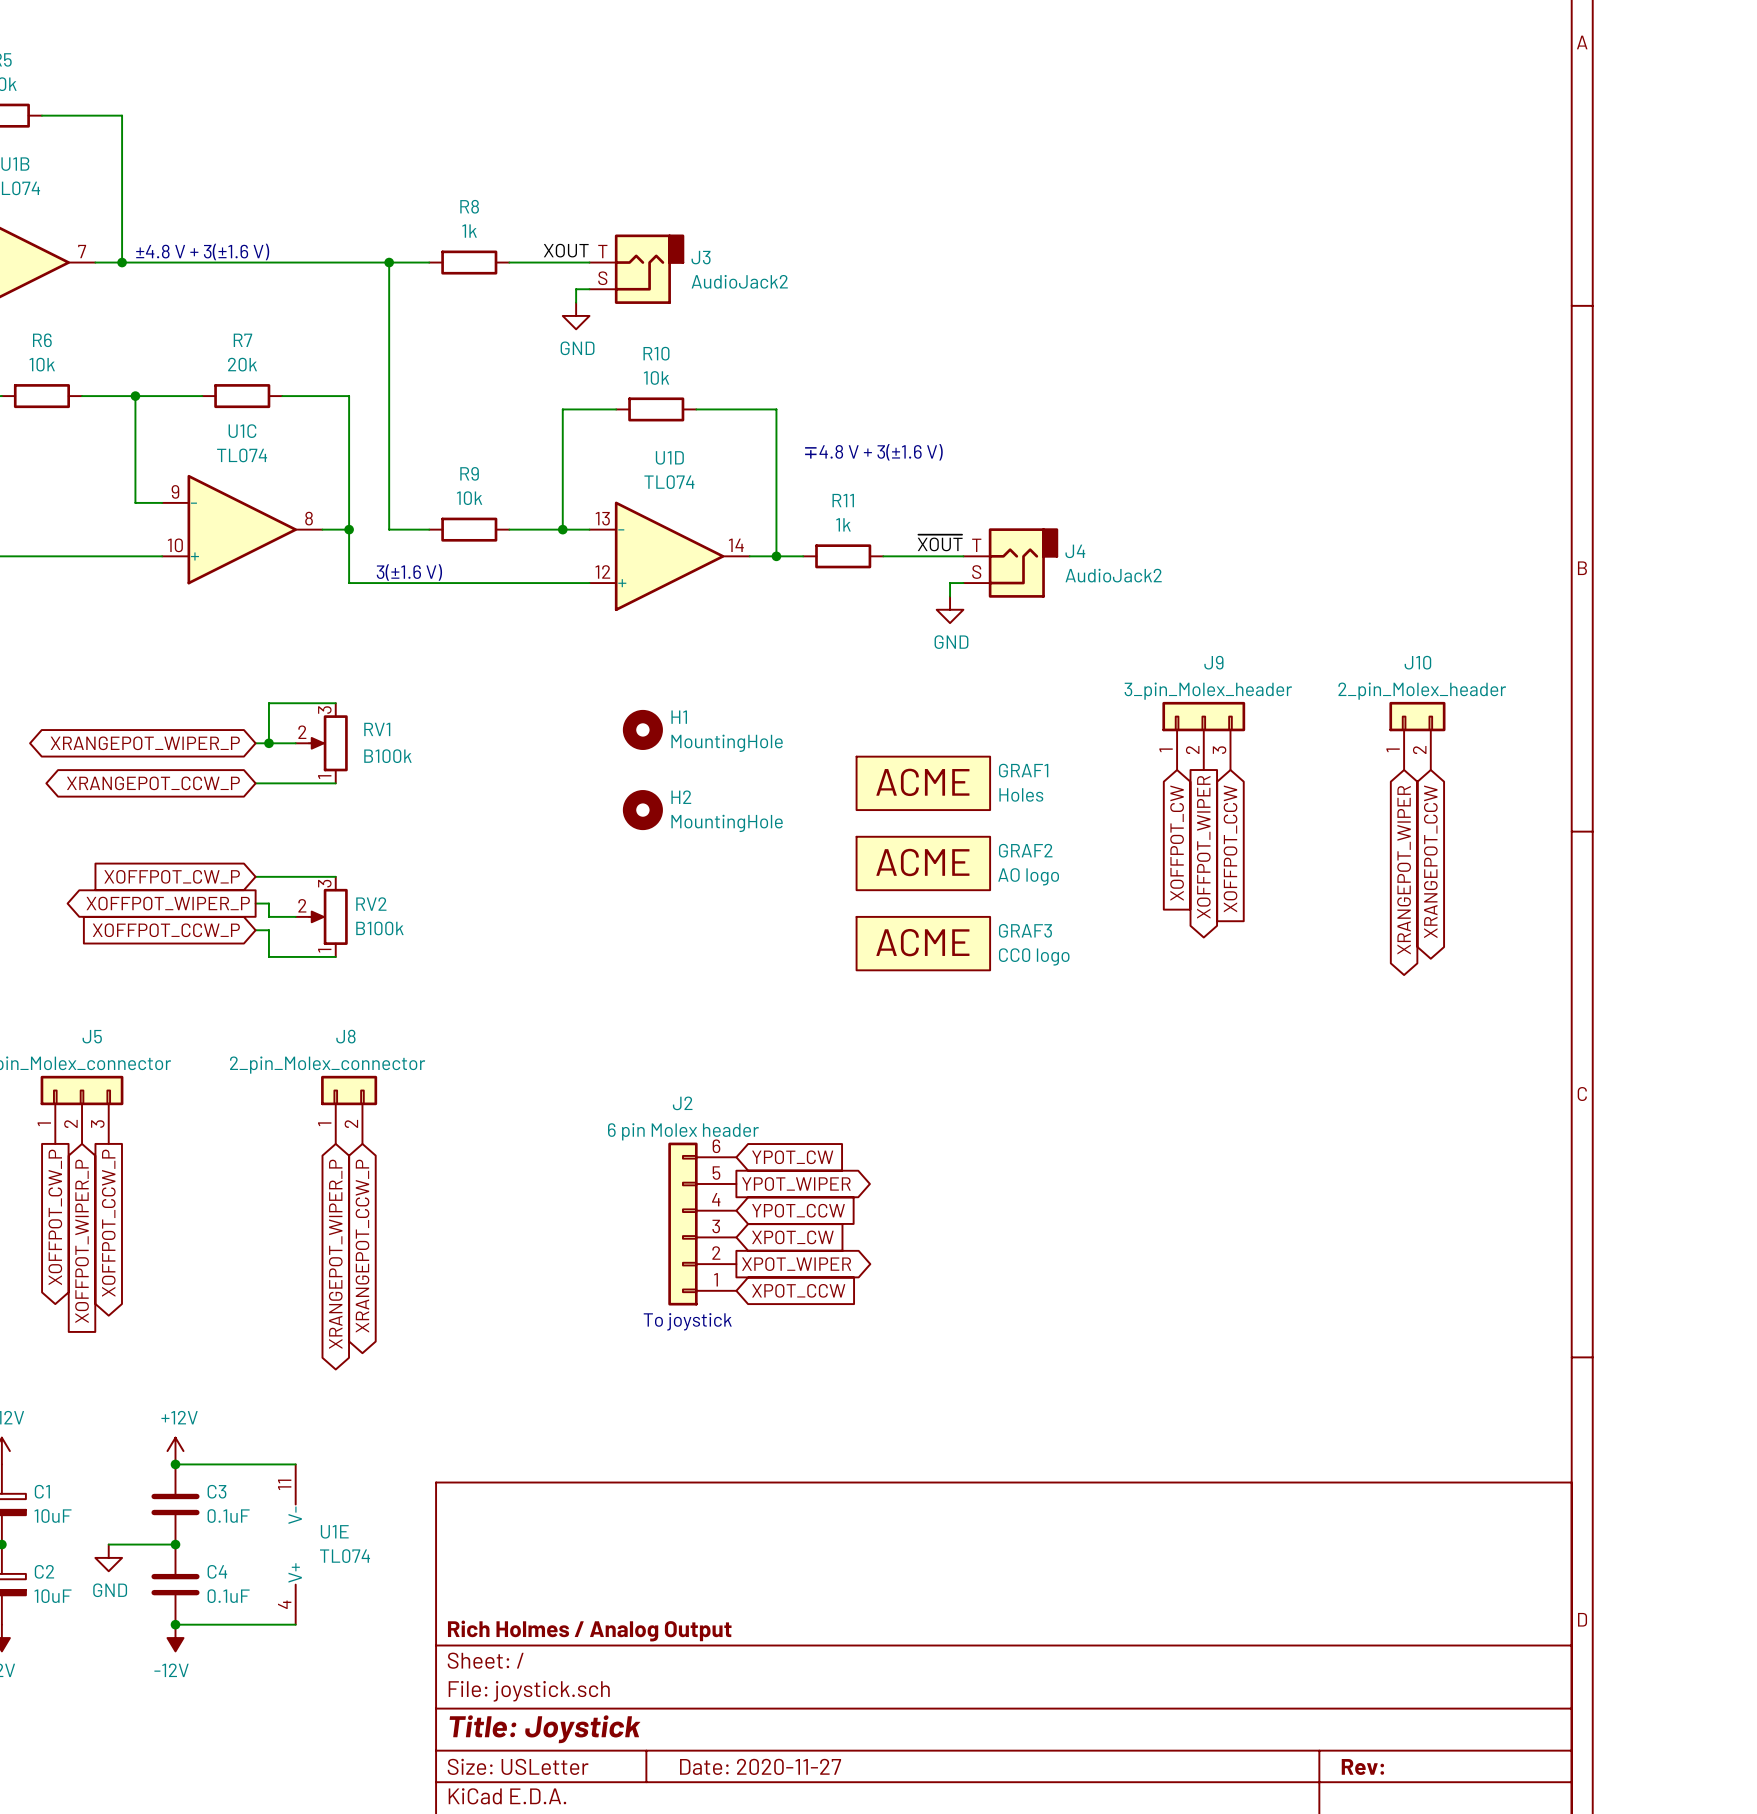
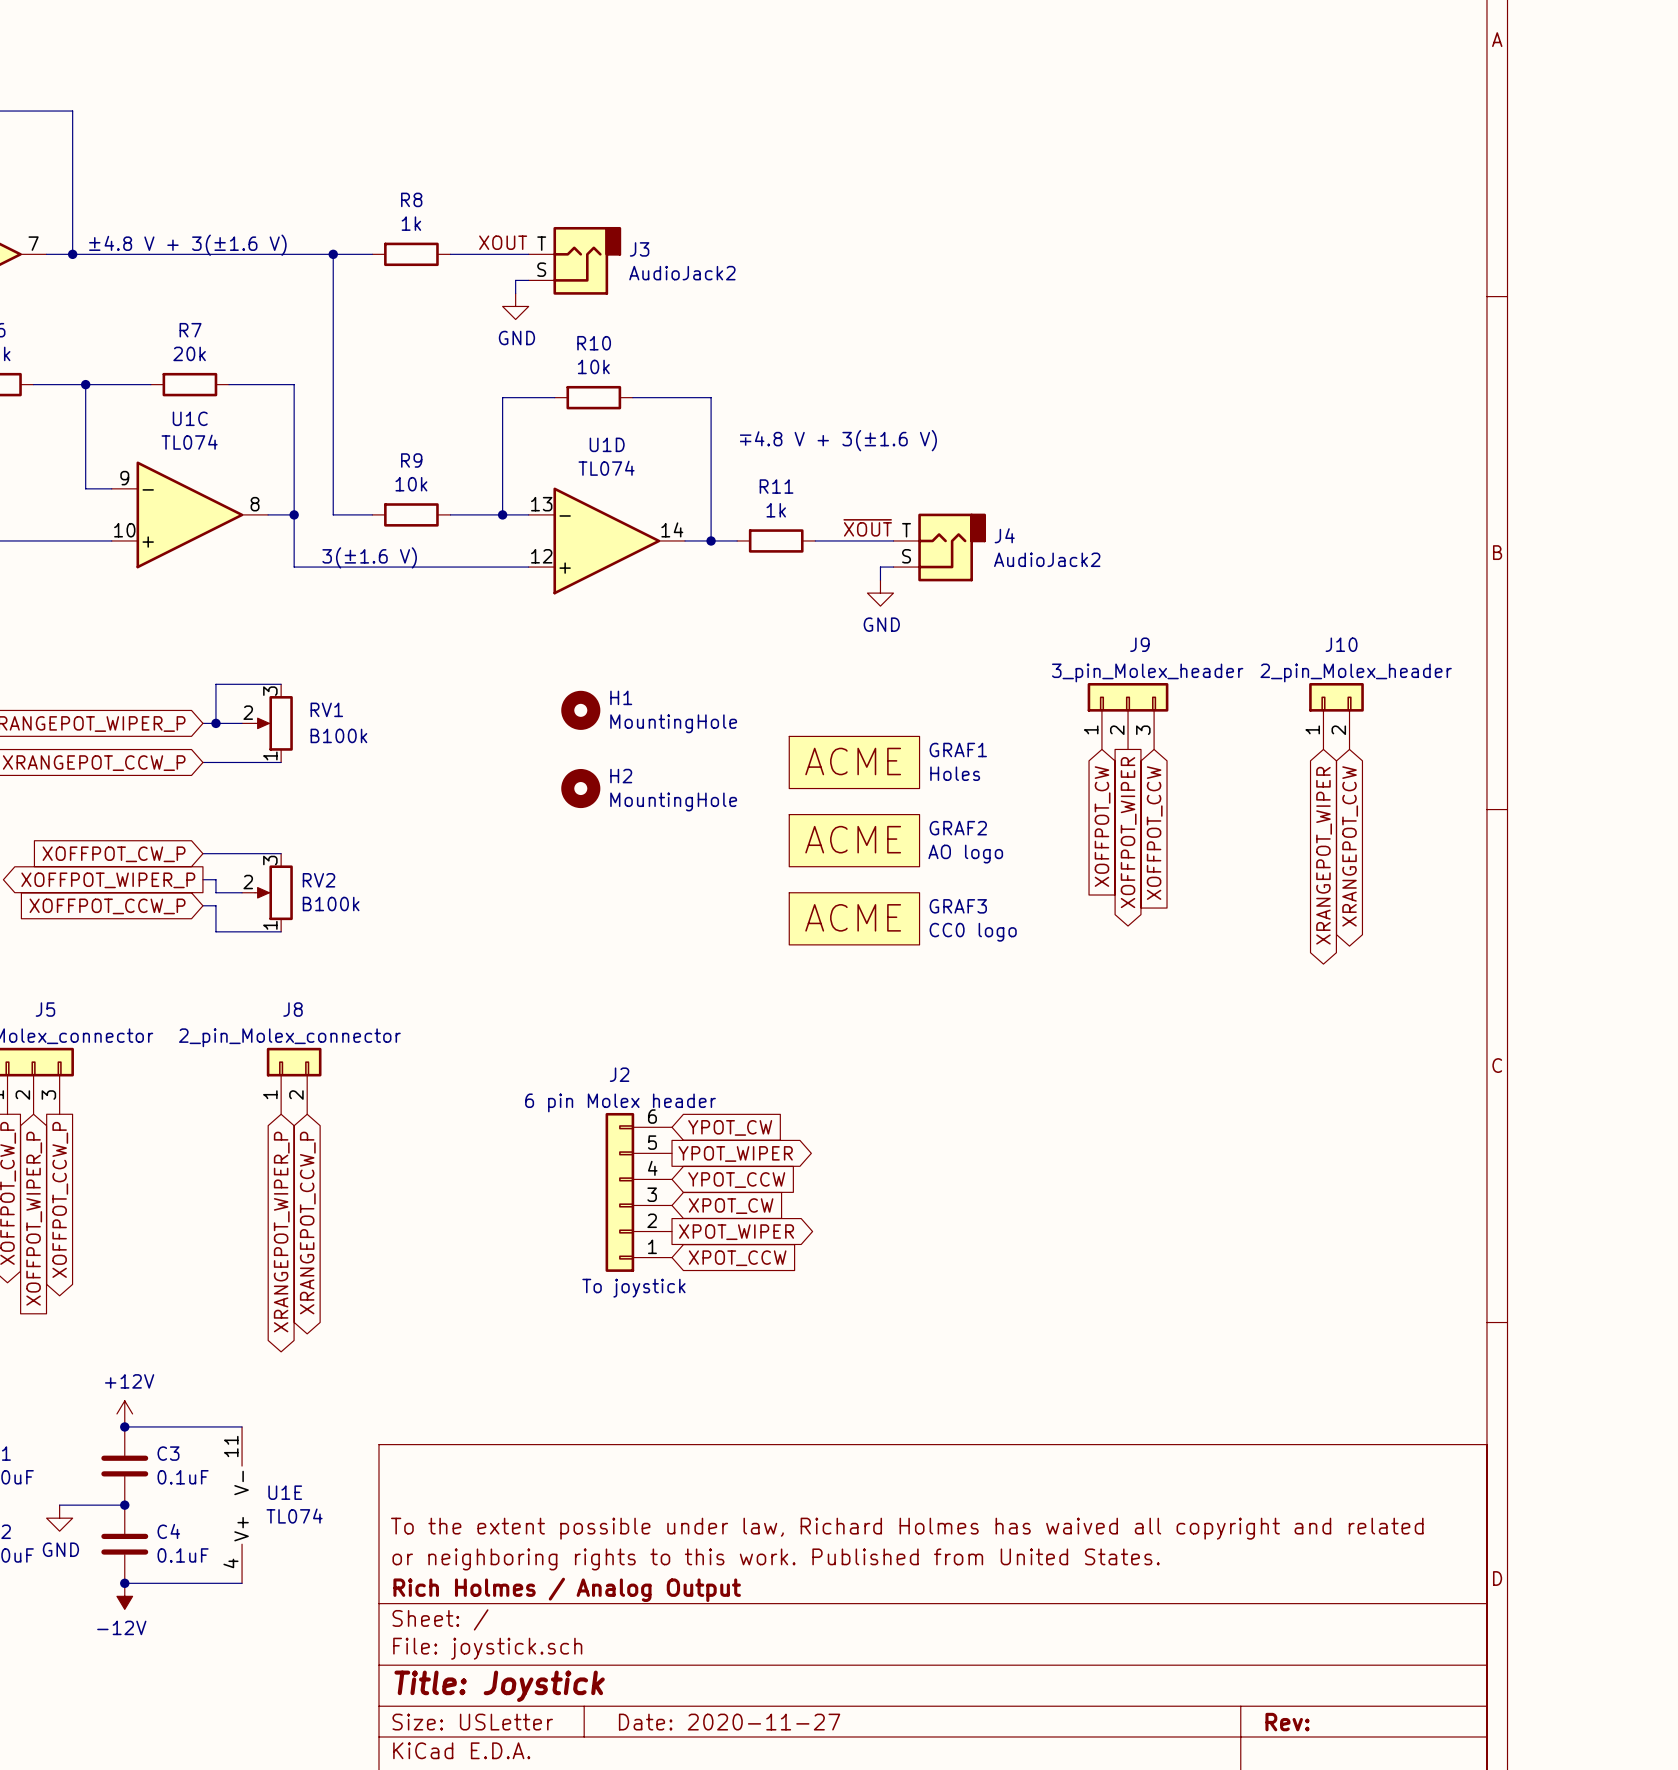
title block: none -> To the extent possible under law, Richard Holmes has waived all copyright and related (907, 1528)
title block: none -> or neighboring rights to this work. Published from United States. (776, 1559)

